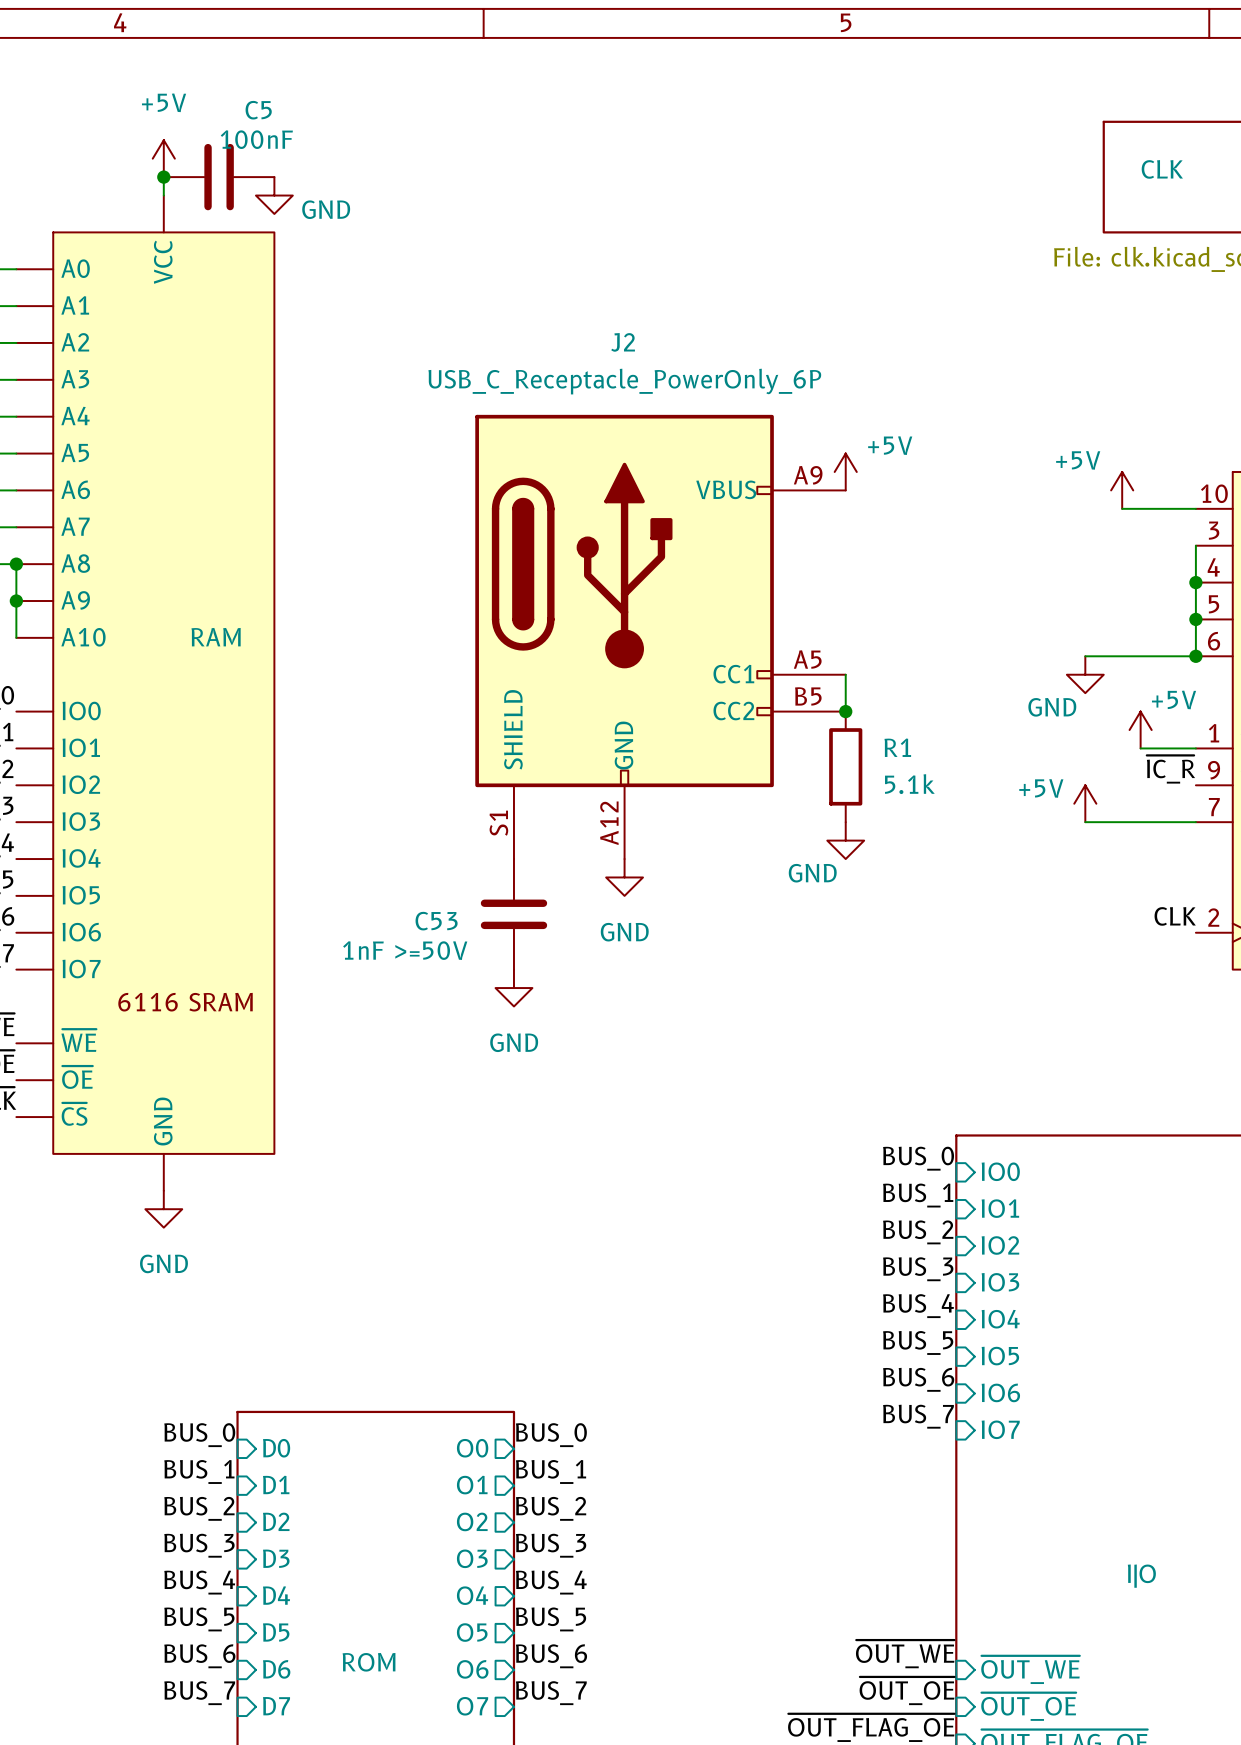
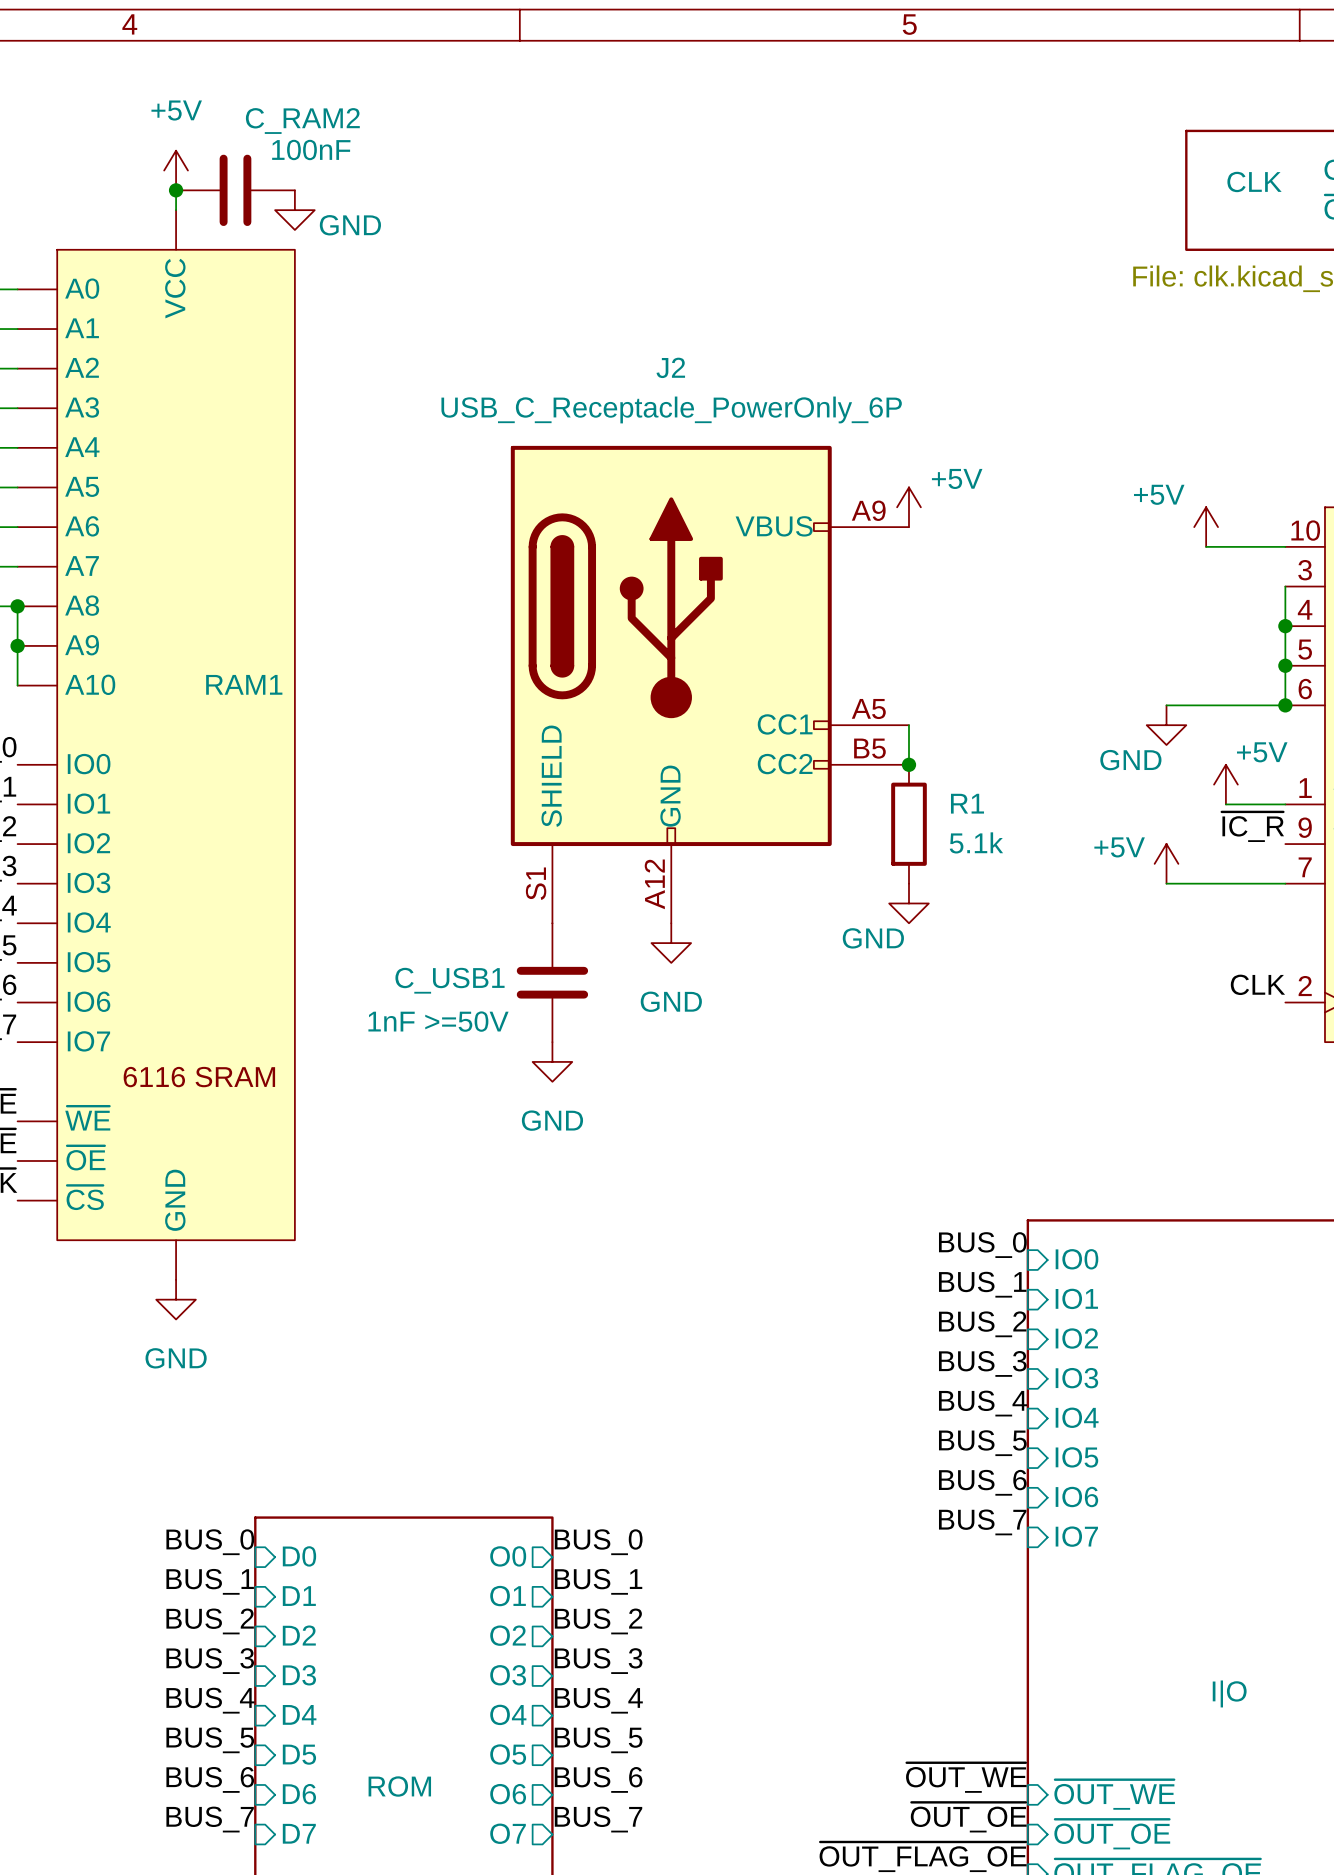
C5 name: C5 (258, 110) -> C_RAM2 (302, 121)
C5 value position: 100nF (256, 139) -> 100nF (311, 149)
RAM name: RAM (216, 637) -> RAM1 (244, 684)
C53 name: C53 (436, 921) -> C_USB1 (450, 980)

